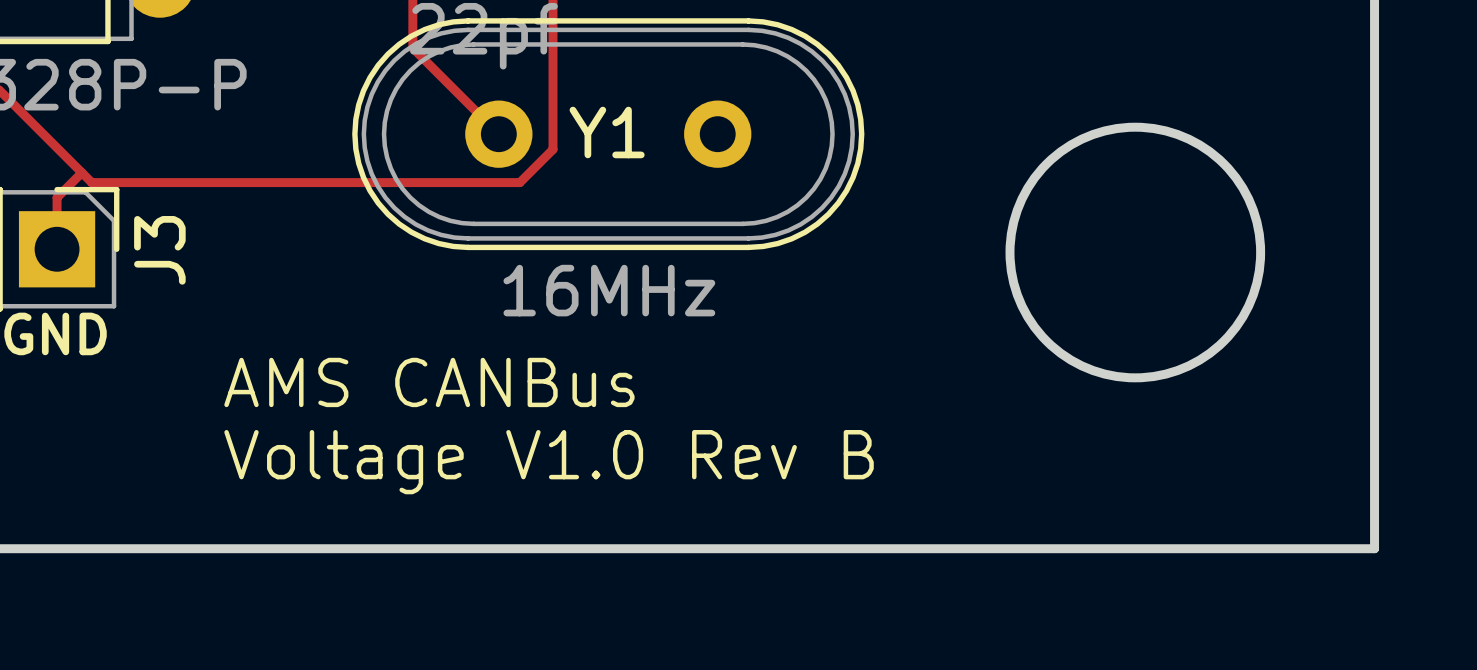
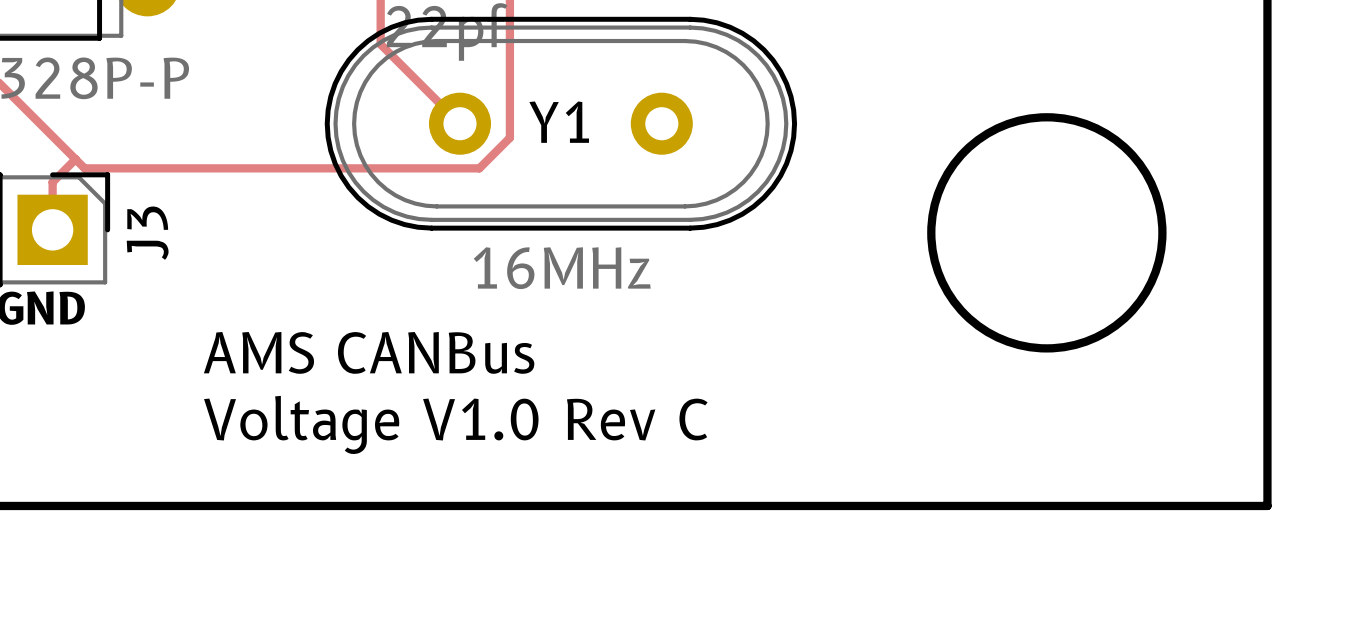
text: Voltage V1.0 Rev B (549, 462) -> Voltage V1.0 Rev C (455, 424)

